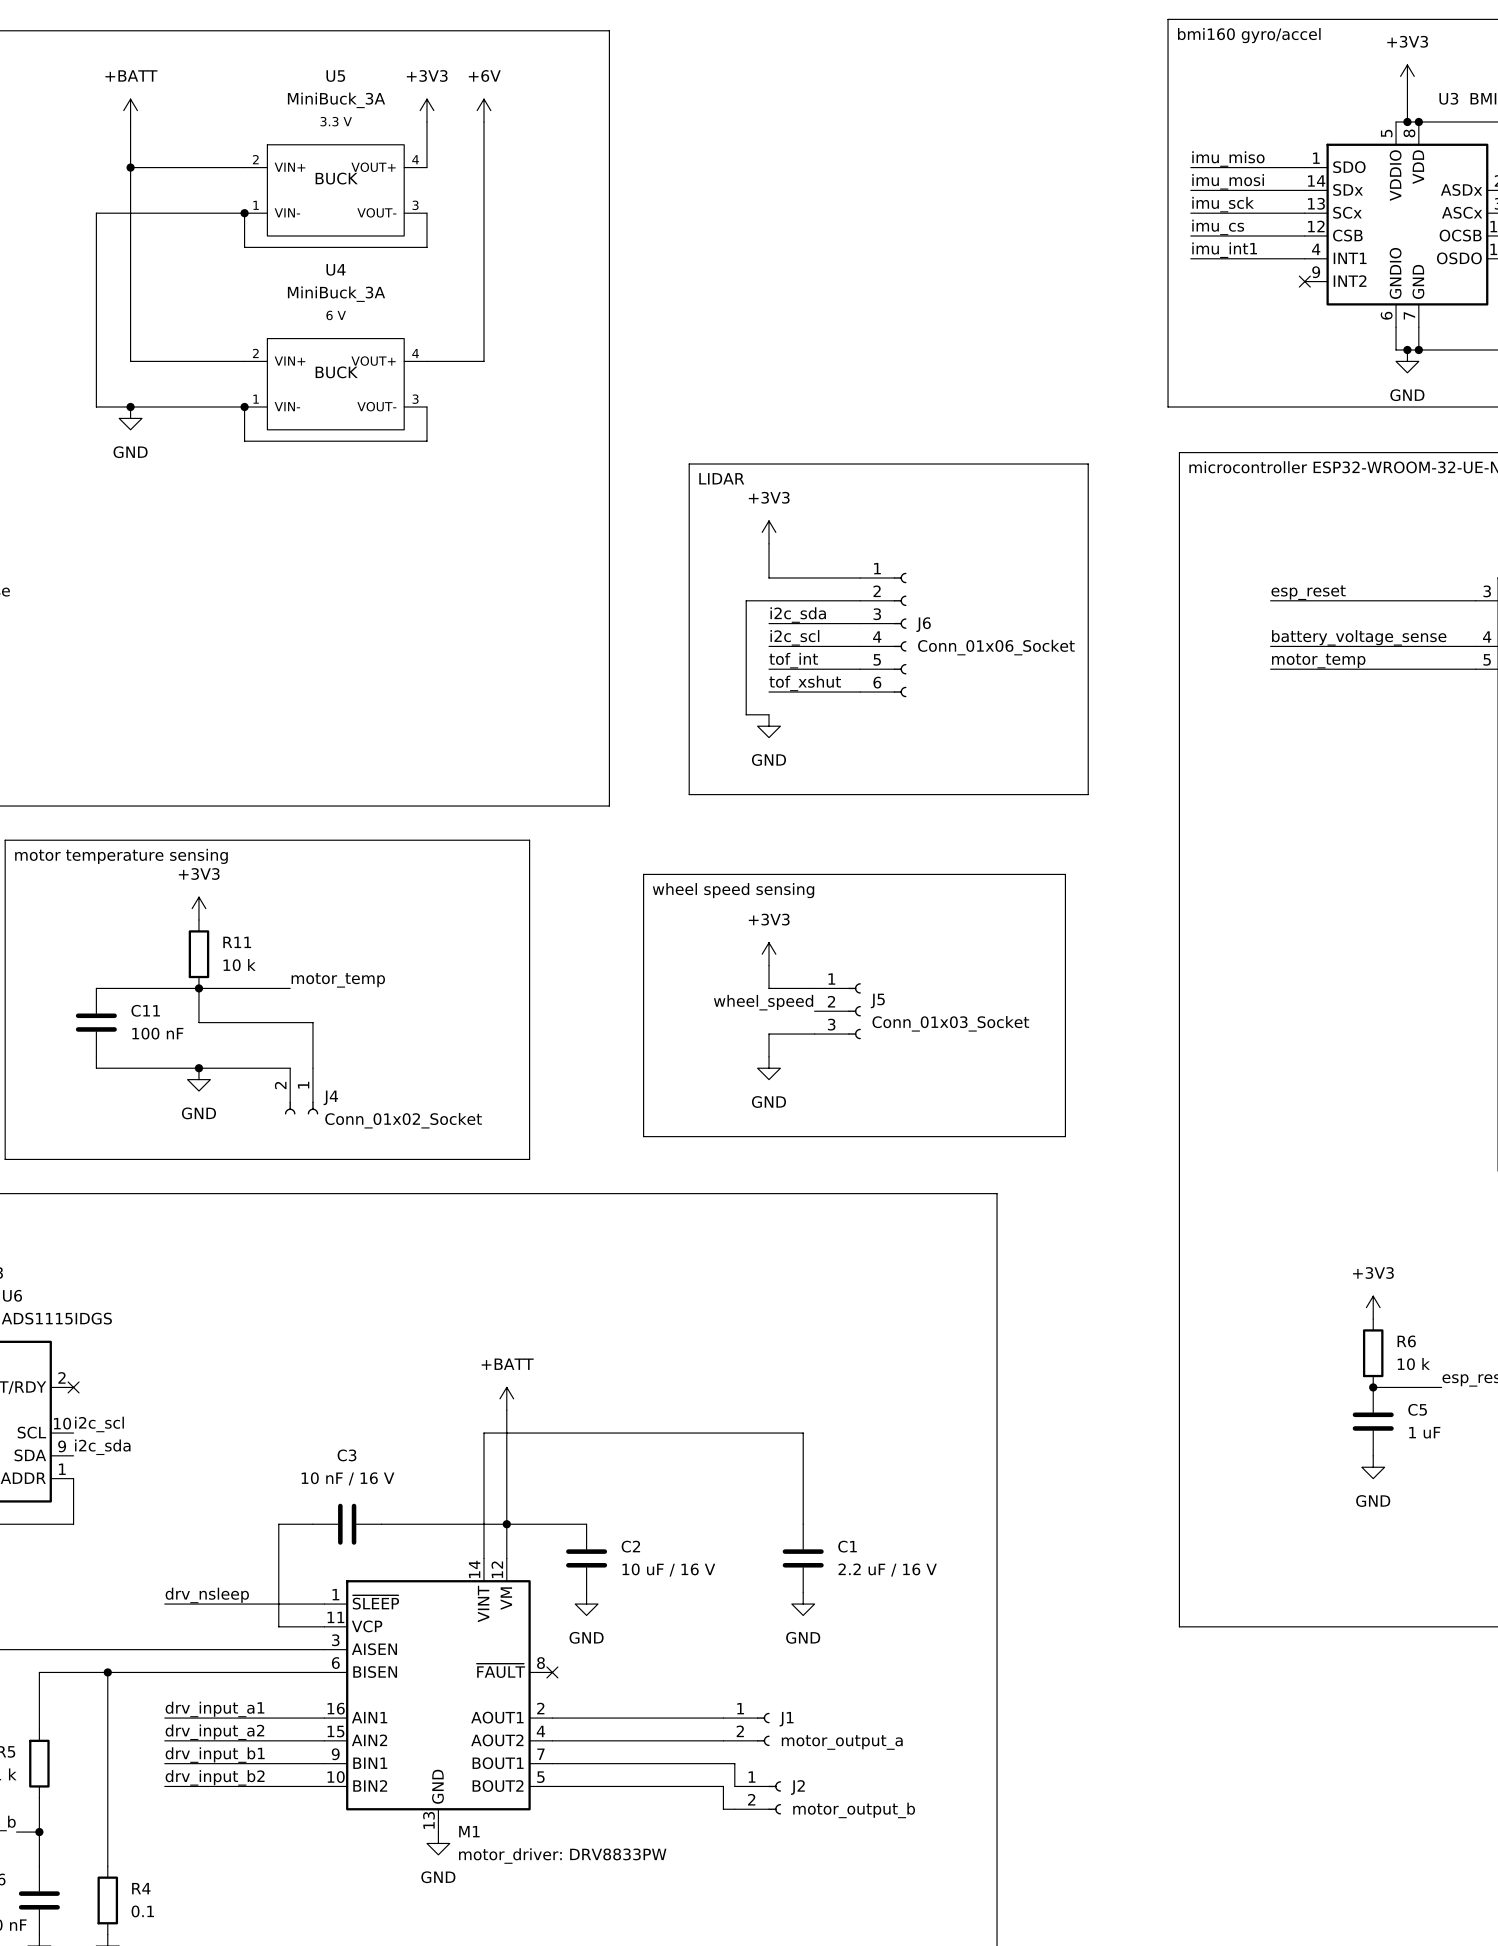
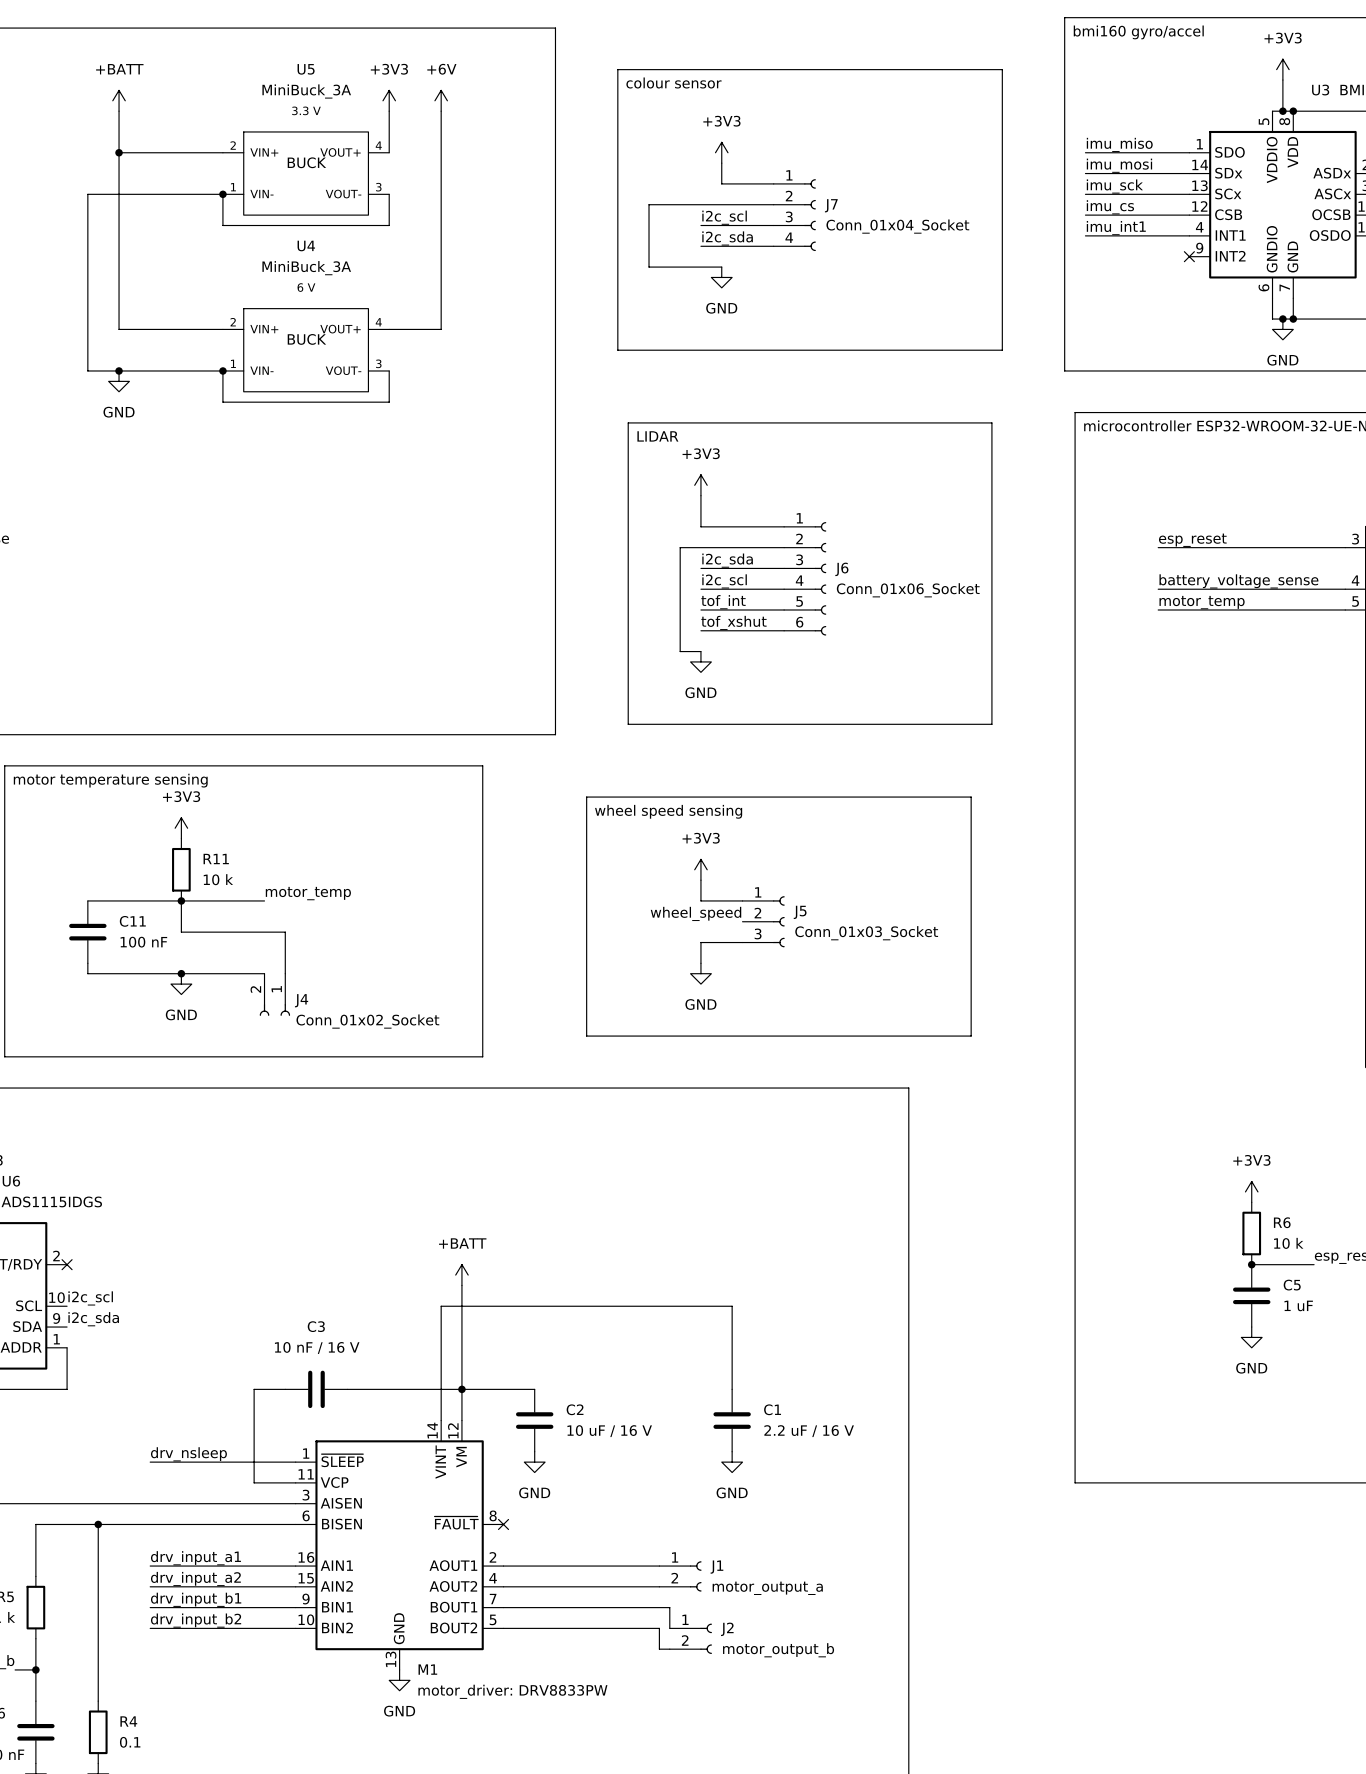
line: none -> (617, 69) (1002, 69) (1002, 350) (617, 350) (617, 69)
text: none -> colour sensor (673, 82)
power symbol: none -> +3V3 (721, 152)
wire: none -> (721, 163) (721, 183) (773, 183)
wire: none -> (773, 204) (649, 204) (649, 267) (721, 267)
J7: none -> Conn_01x04_Socket (794, 215)
label: none -> i2c_scl (724, 217)
wire: none -> (700, 225) (773, 225)
label: none -> i2c_sda (727, 238)
wire: none -> (700, 246) (773, 246)
power symbol: none -> GND (721, 277)

